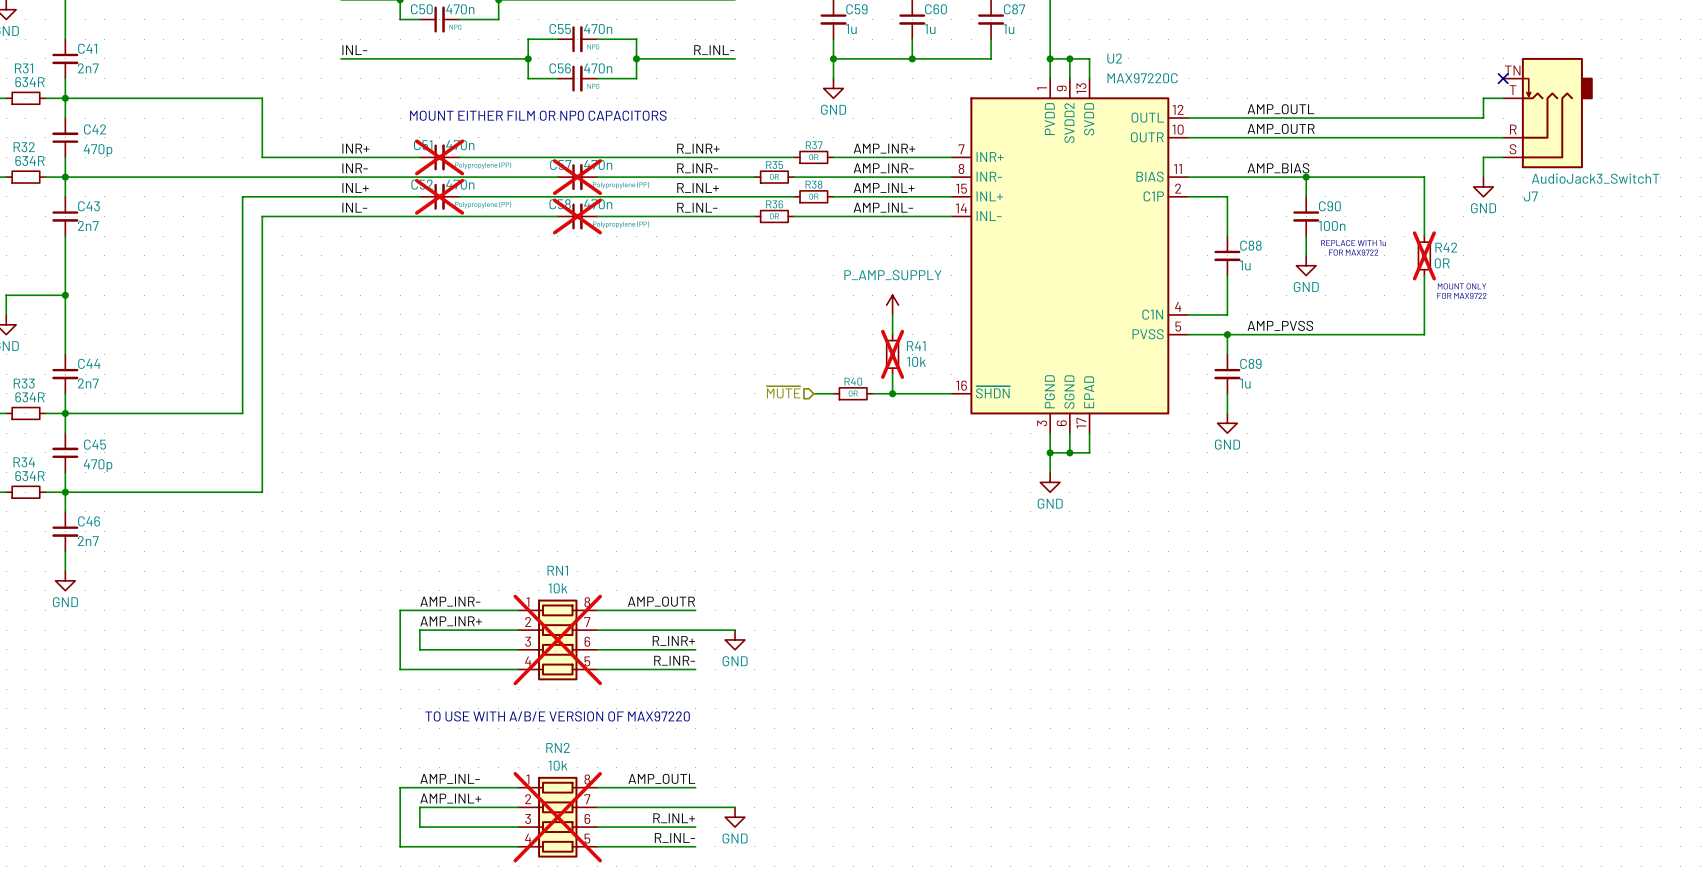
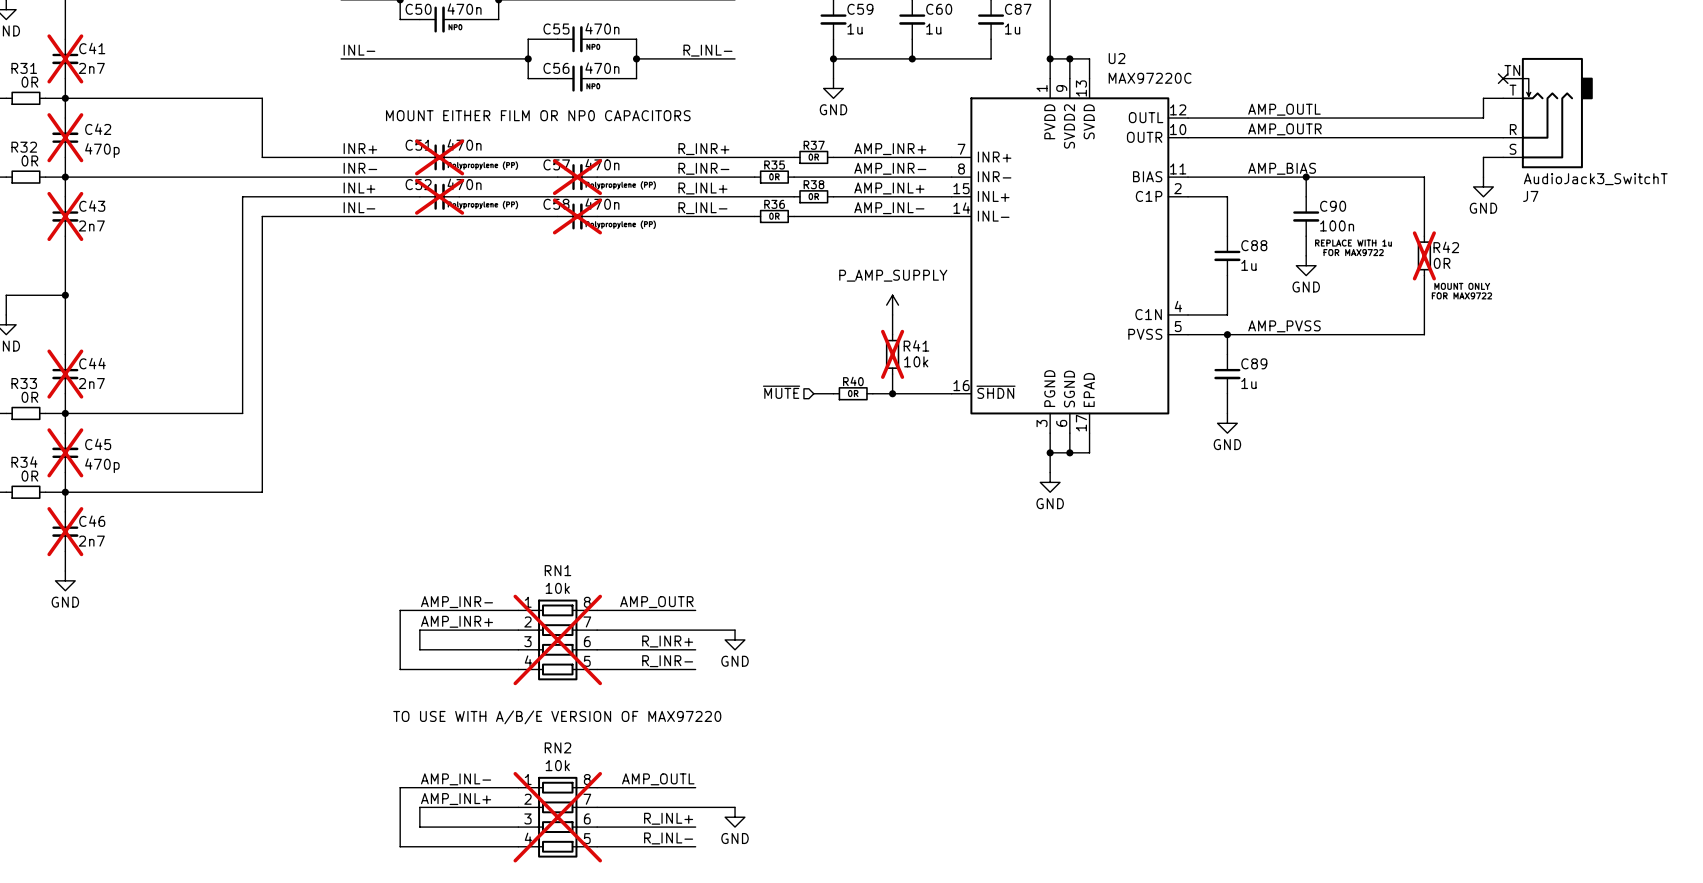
C41 do-not-place cross: none -> (65, 58)
R31 value: 634R (30, 82) -> 0R (29, 82)
C42 do-not-place cross: none -> (65, 137)
R32 value: 634R (30, 160) -> 0R (29, 160)
C43 do-not-place cross: none -> (65, 216)
C44 do-not-place cross: none -> (65, 374)
R33 value: 634R (30, 397) -> 0R (29, 397)
C45 do-not-place cross: none -> (65, 452)
R34 value: 634R (30, 476) -> 0R (29, 476)
C46 do-not-place cross: none -> (65, 531)

